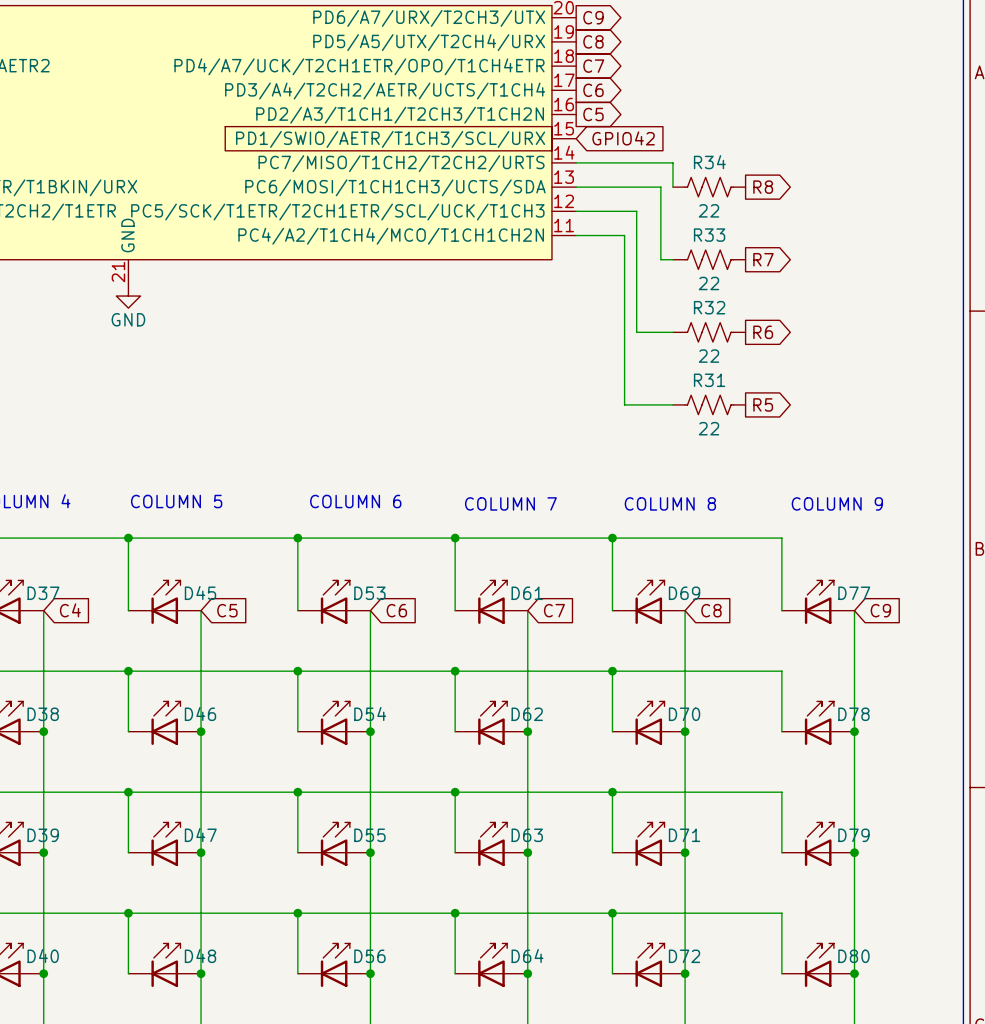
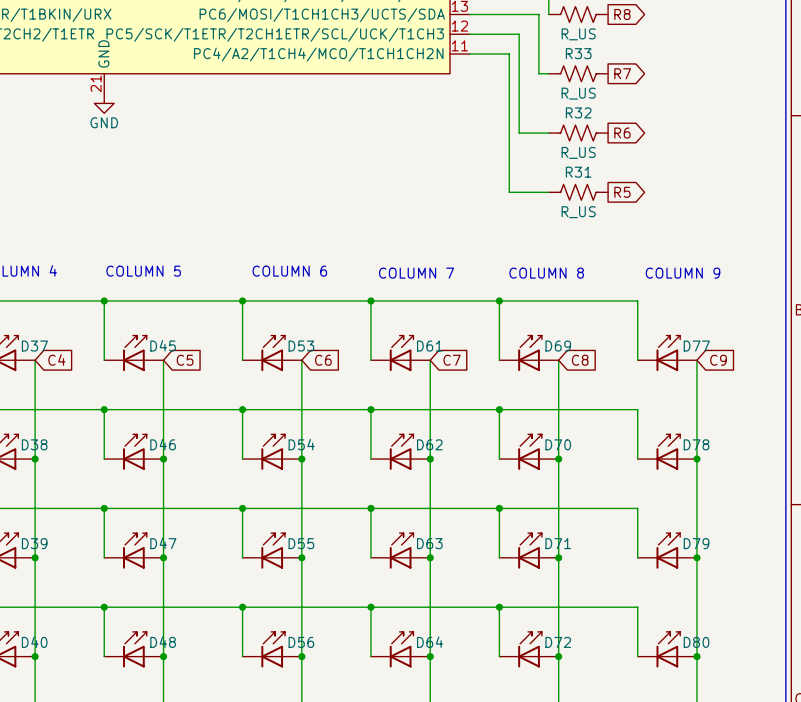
R34 value: 22 (708, 210) -> R_US (578, 34)
R33 value: 22 (708, 283) -> R_US (578, 93)
R32 value: 22 (708, 356) -> R_US (578, 152)
R31 value: 22 (708, 428) -> R_US (578, 212)

